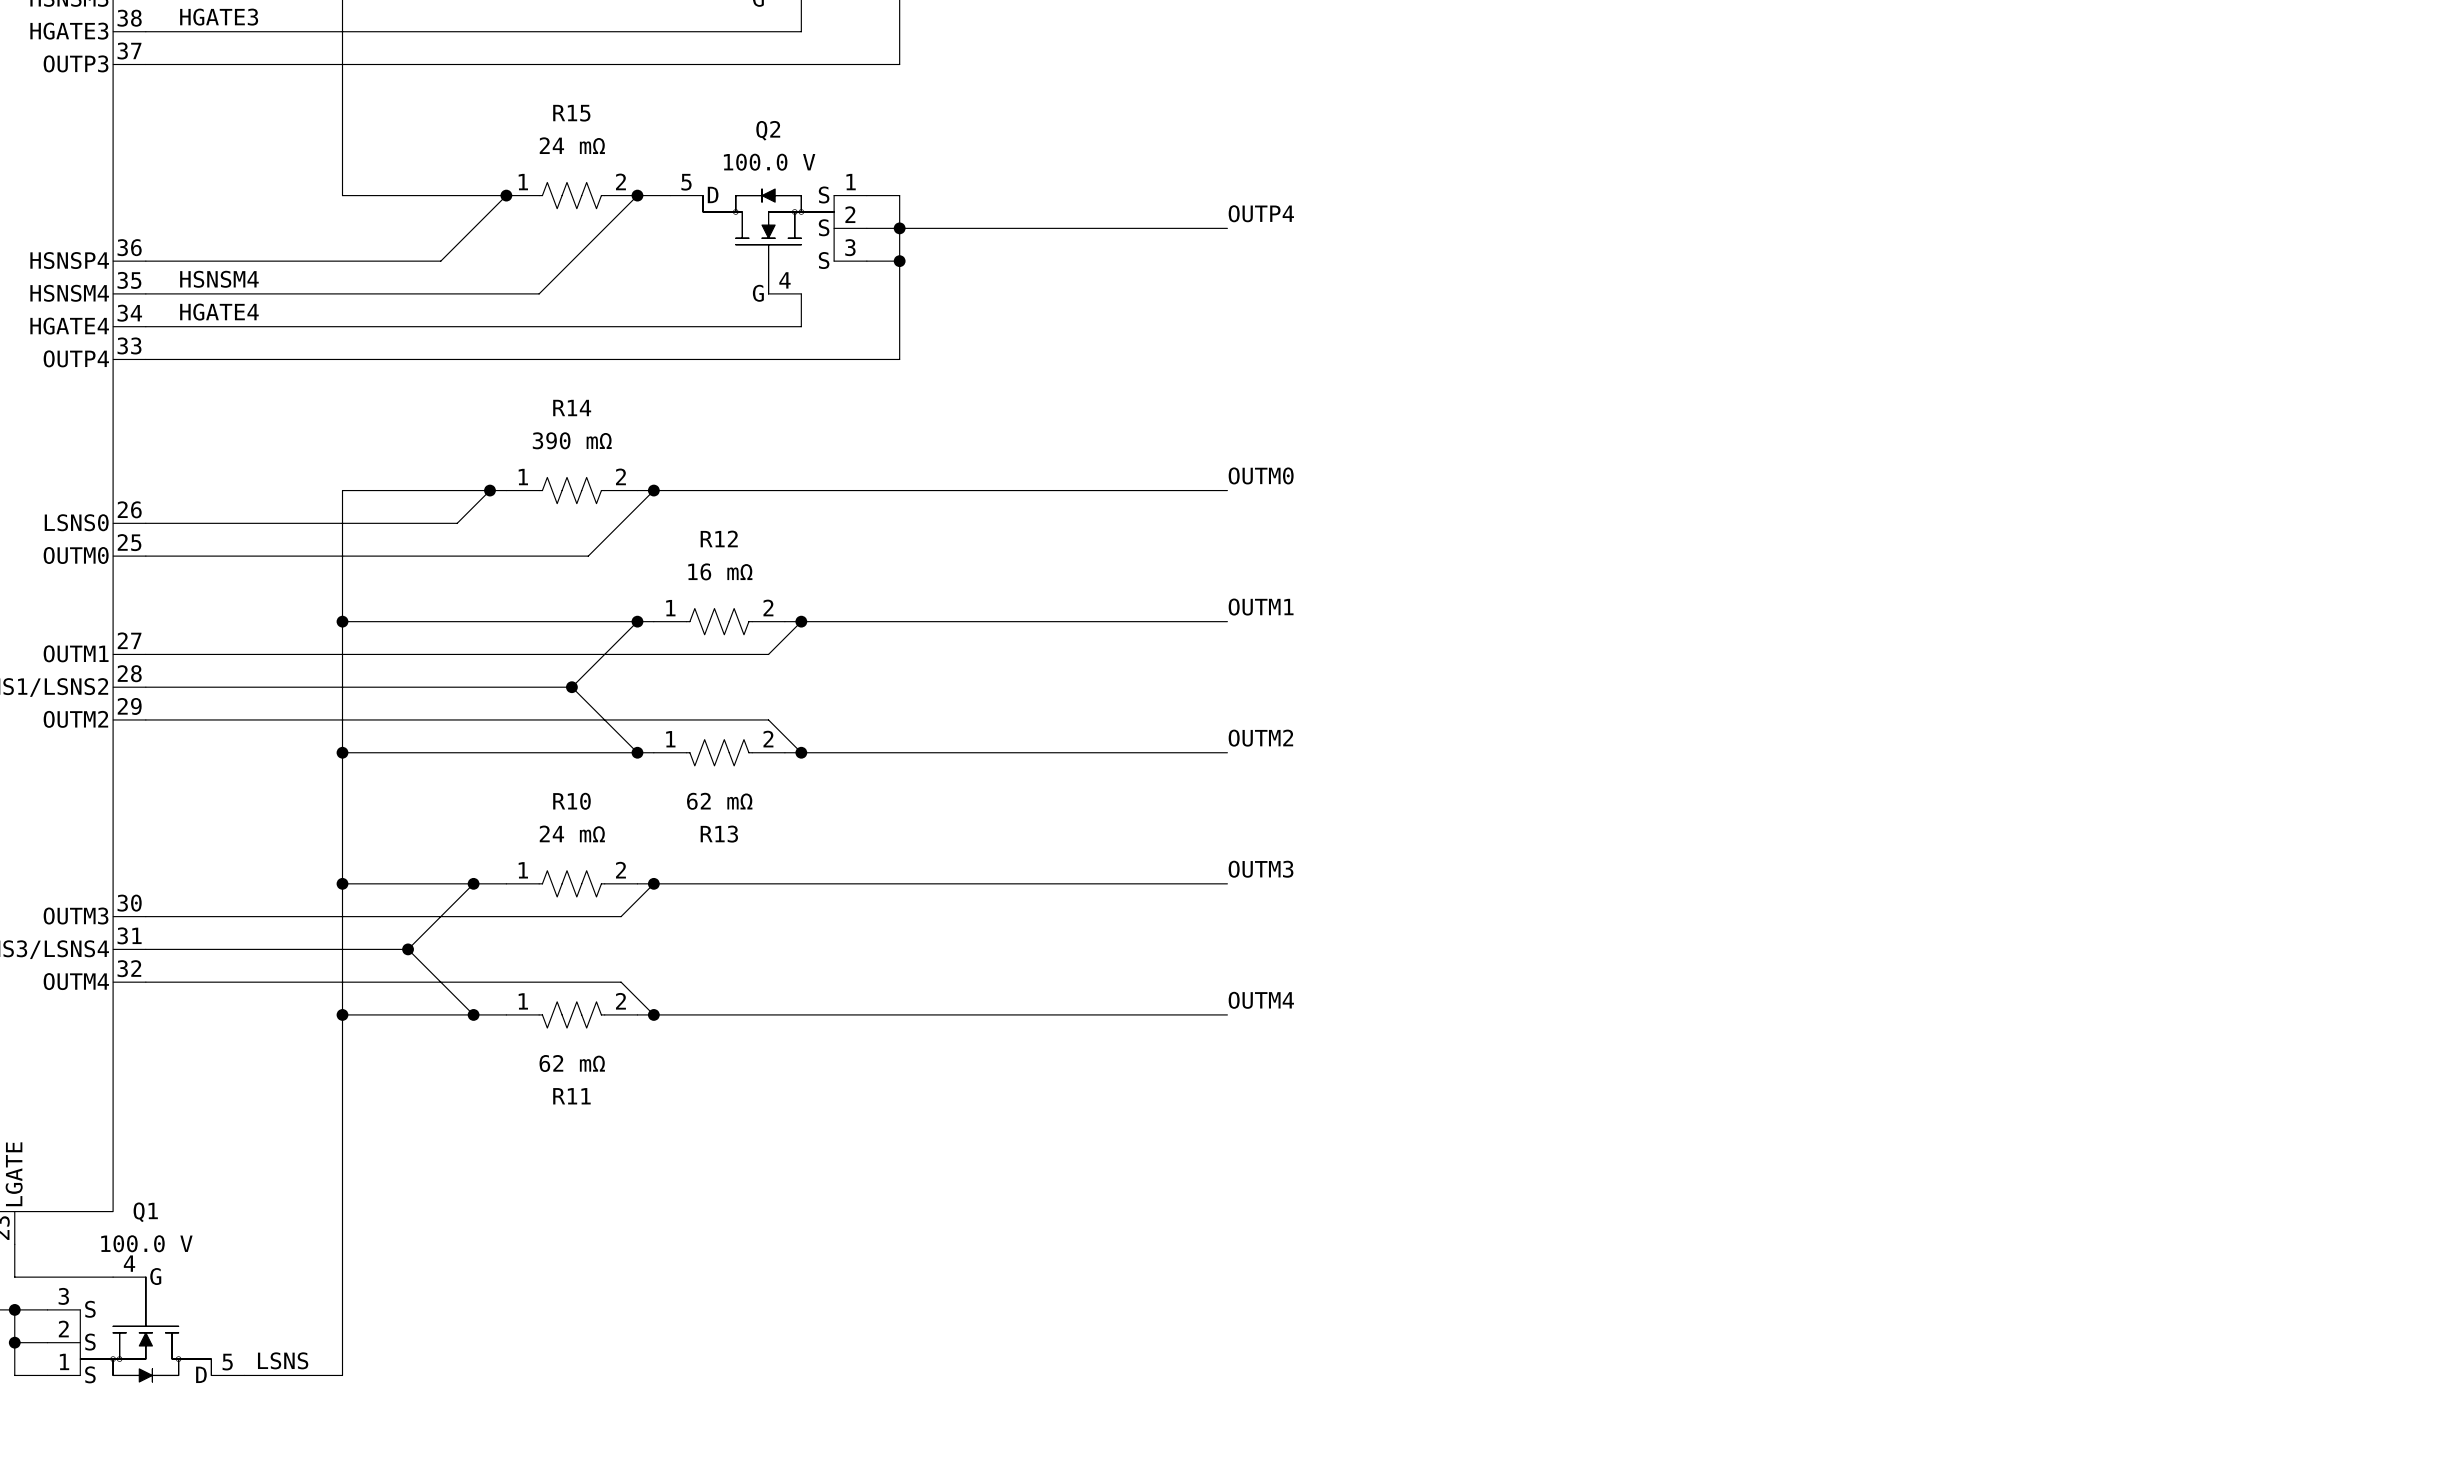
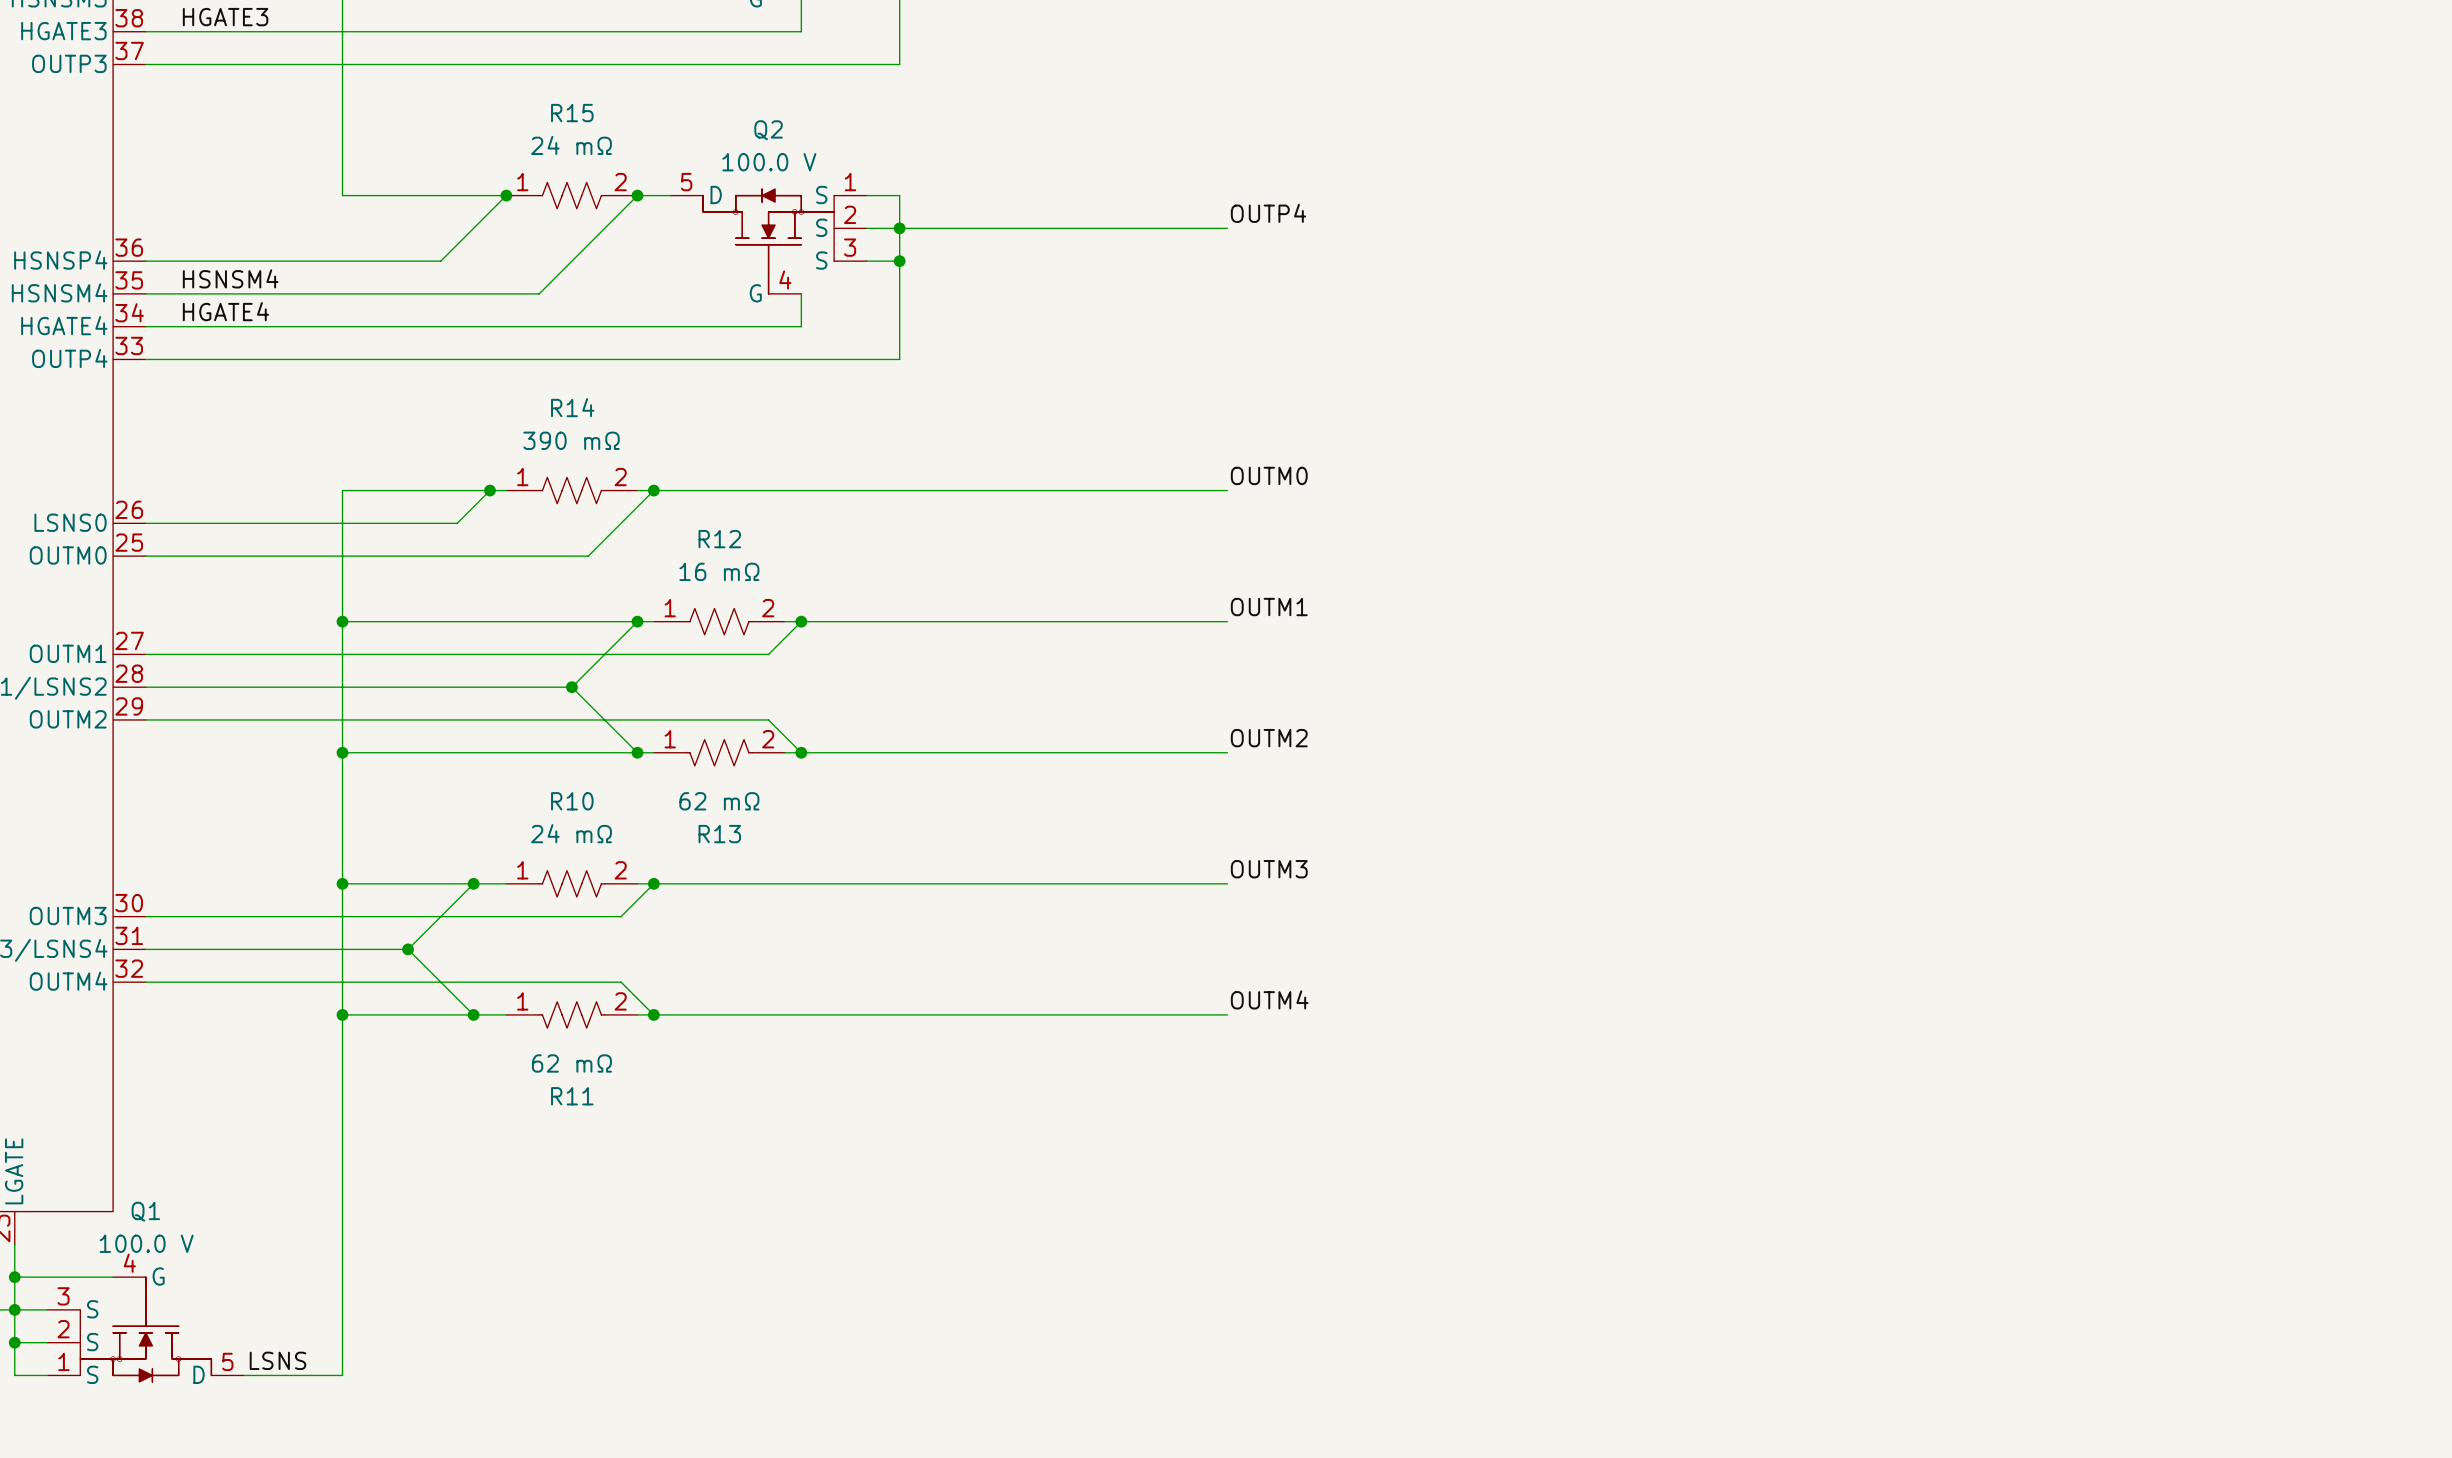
wire: none -> (14, 1277) (14, 1309)
junction: none -> (14, 1277)

